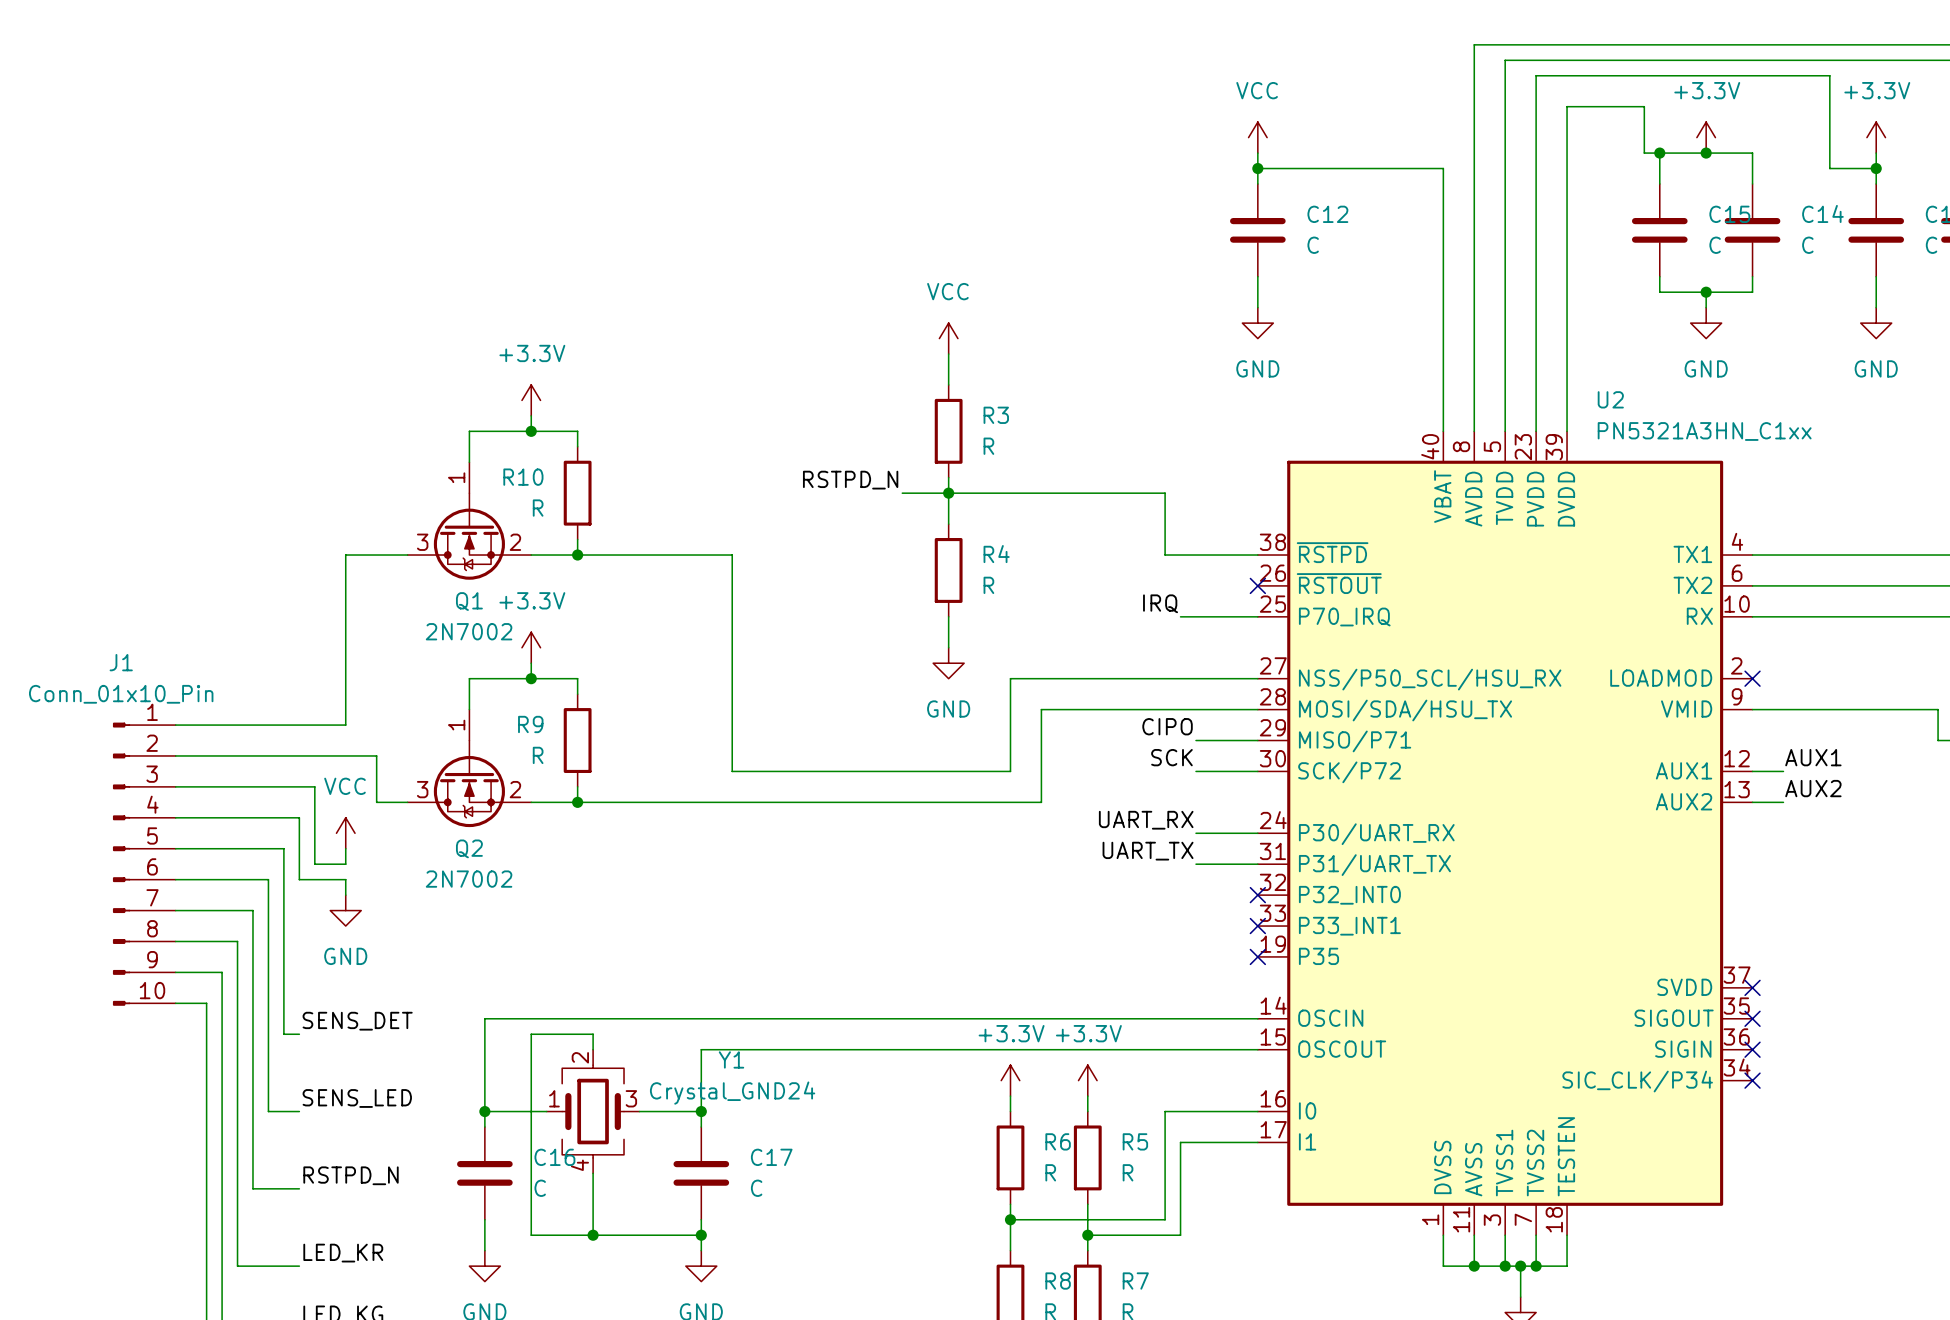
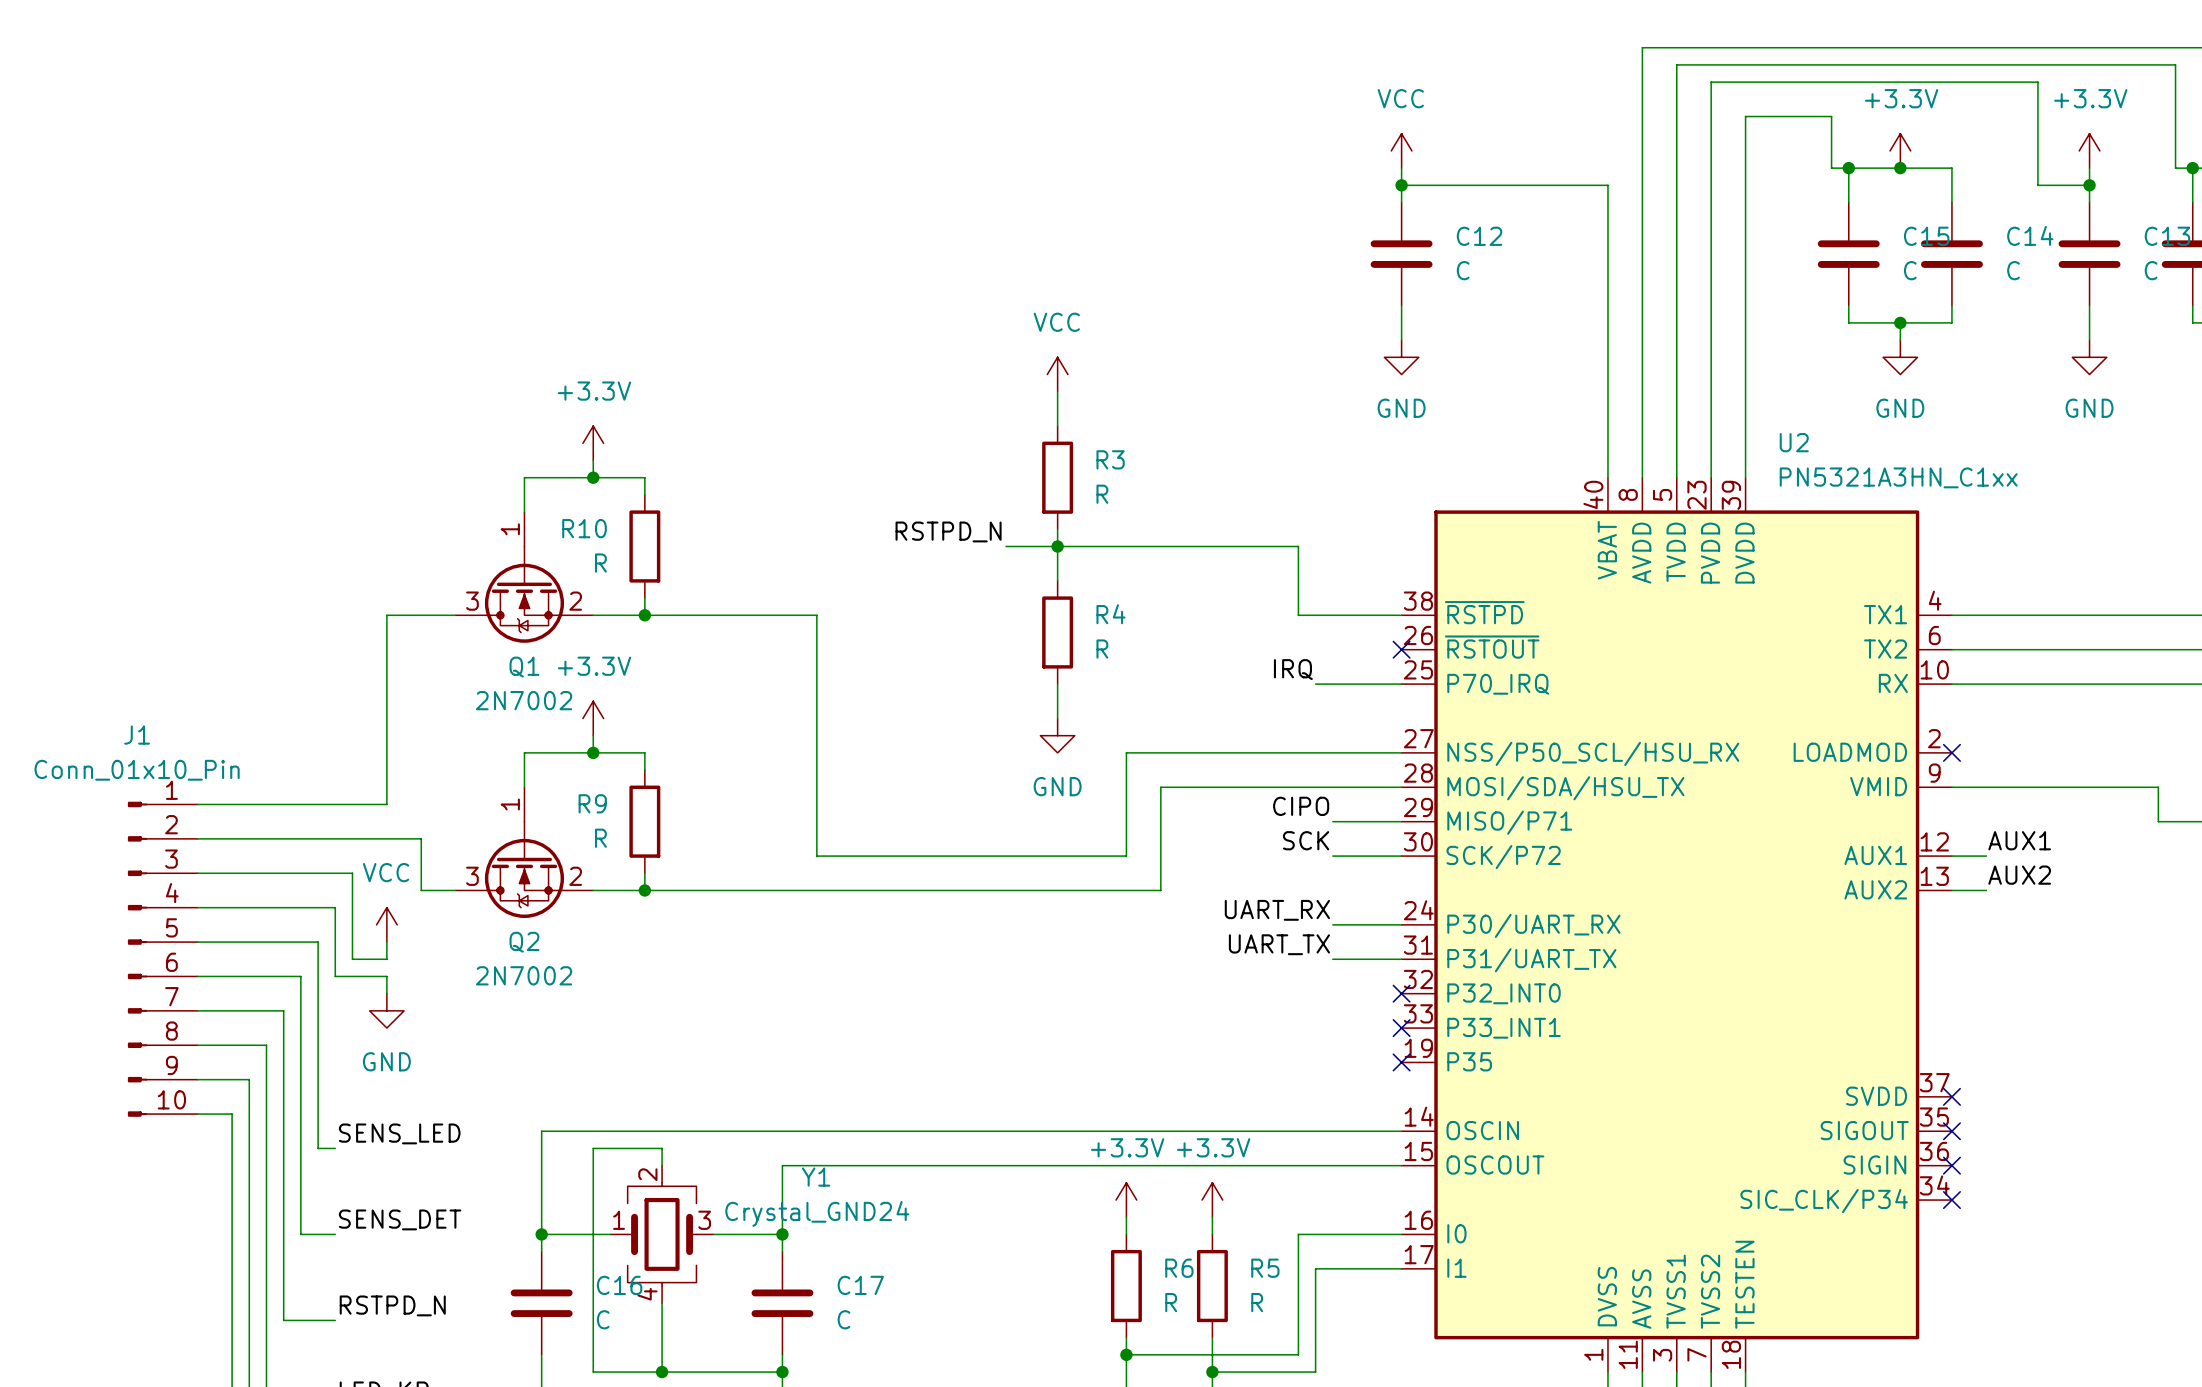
label: SENS_DET (357, 1021) -> SENS_LED (399, 1133)
label: SENS_LED (357, 1098) -> SENS_DET (400, 1219)

